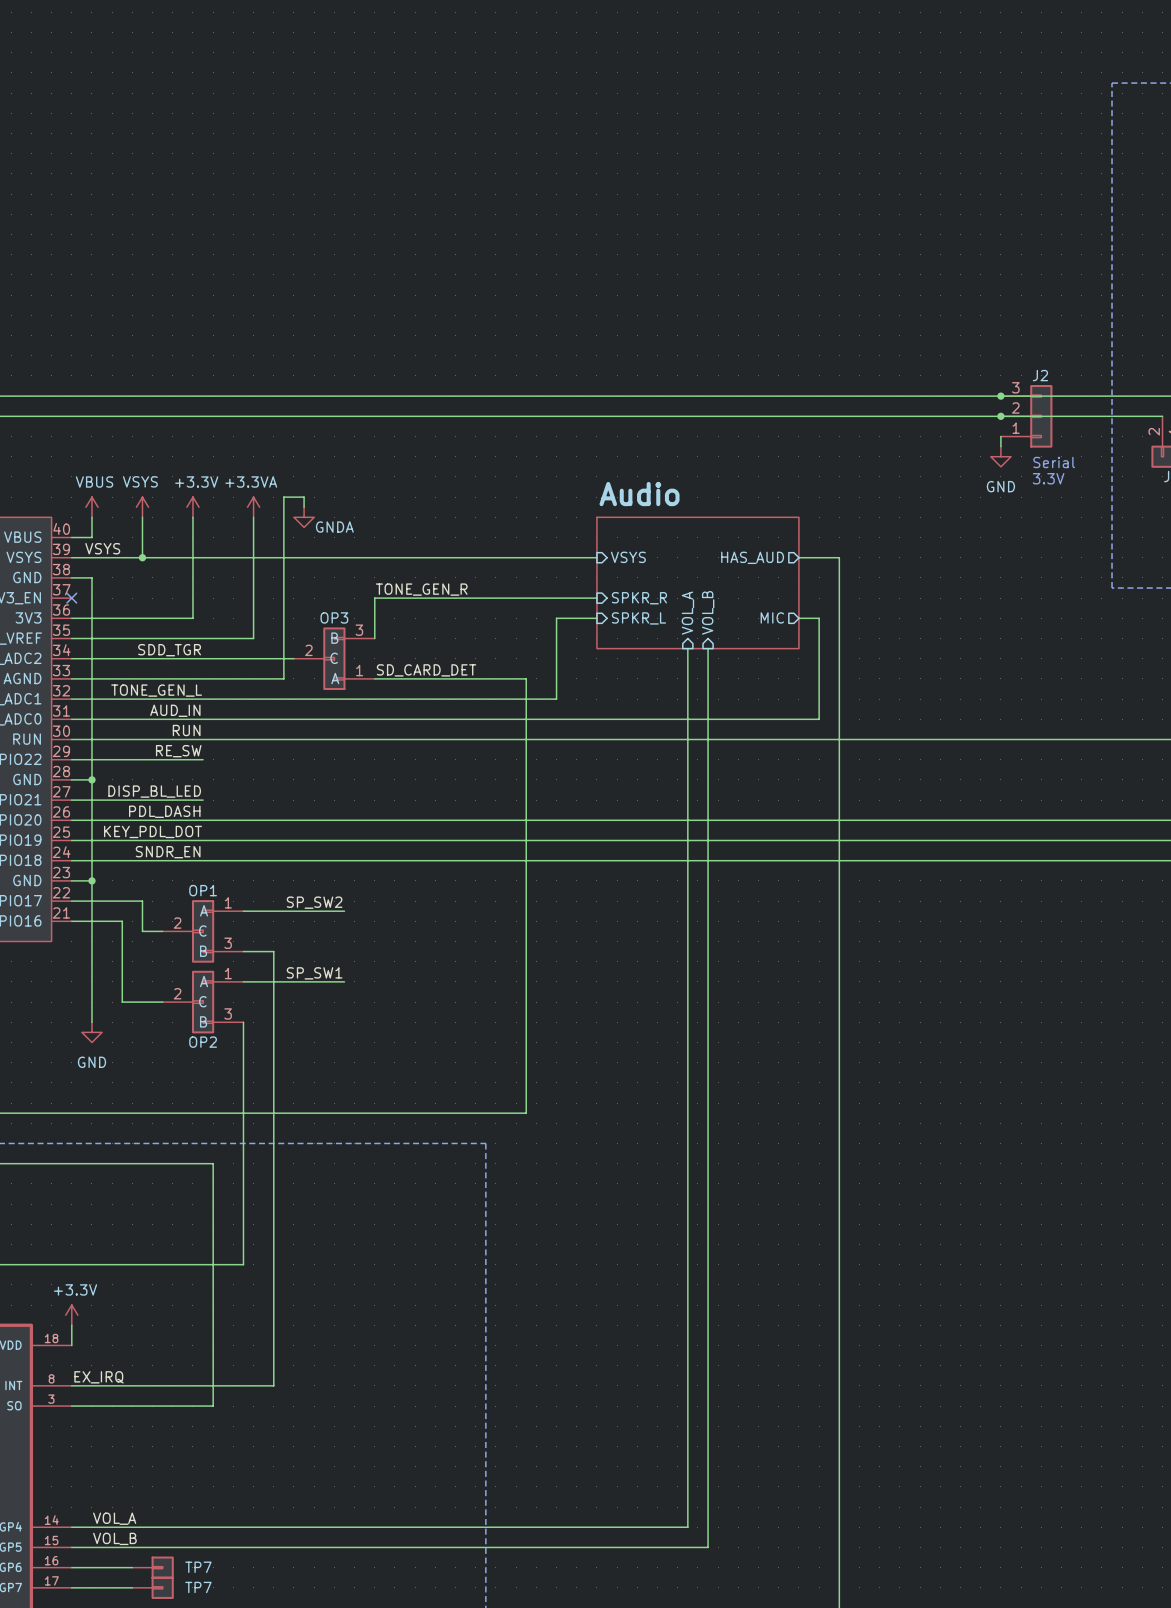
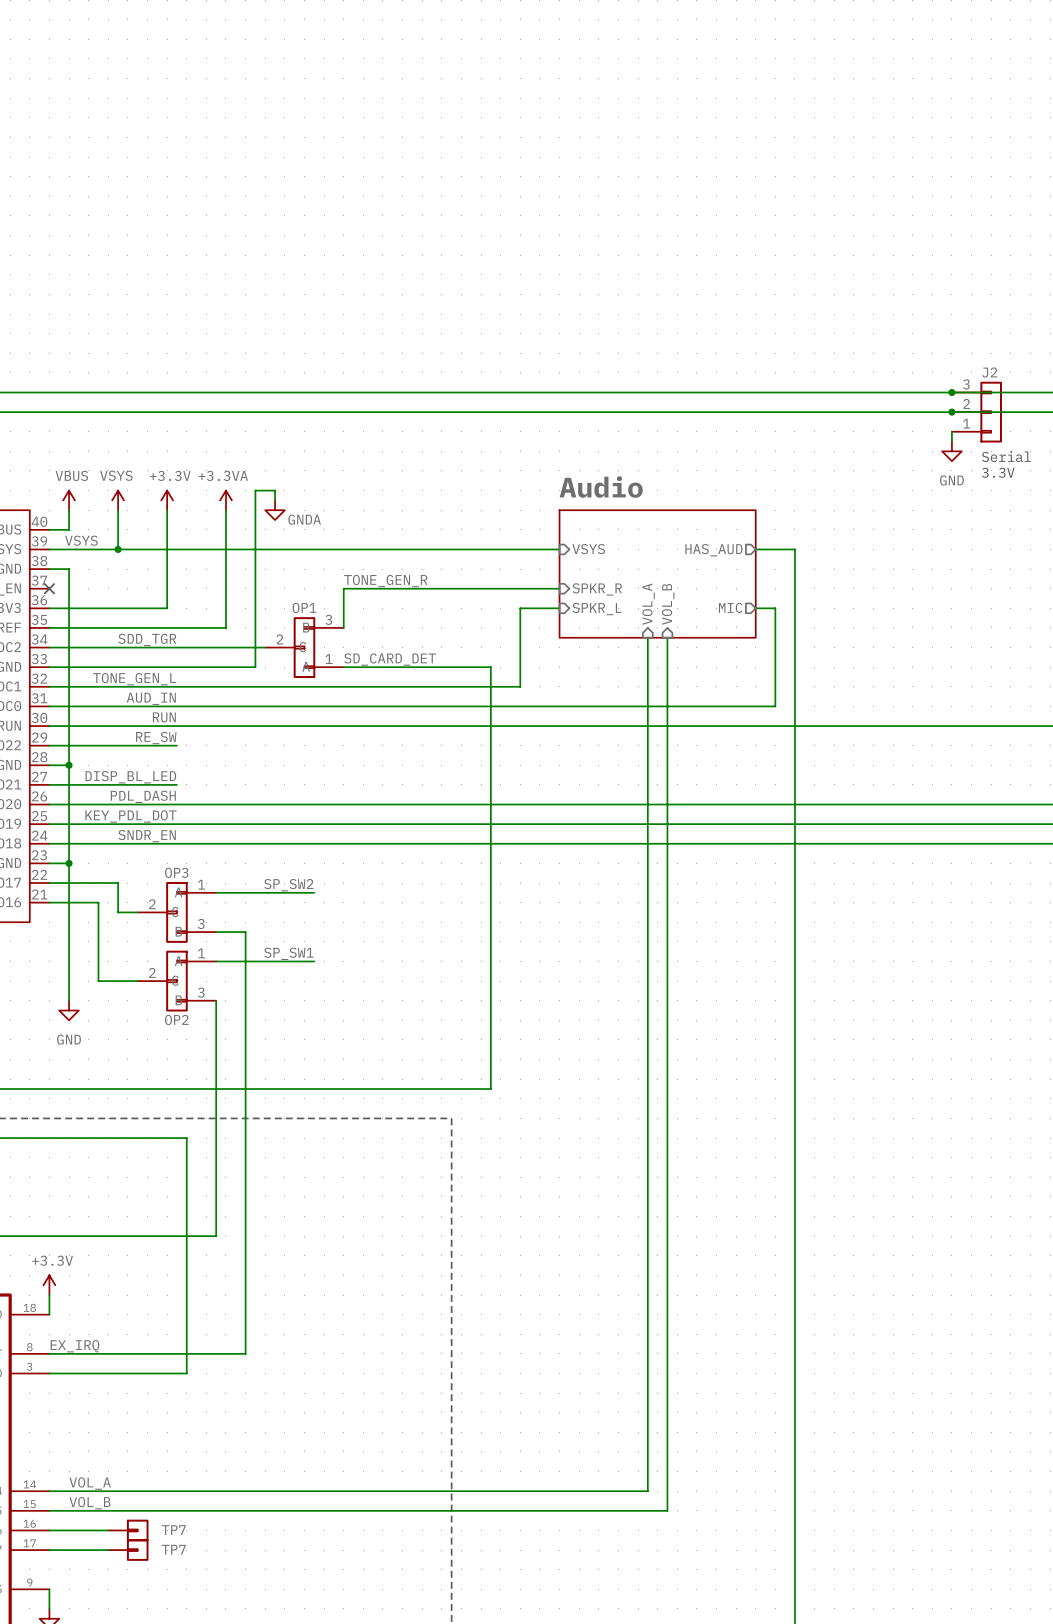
OP3 name: OP3 (334, 617) -> OP1 (304, 607)
OP1 name: OP1 (203, 890) -> OP3 (176, 872)

